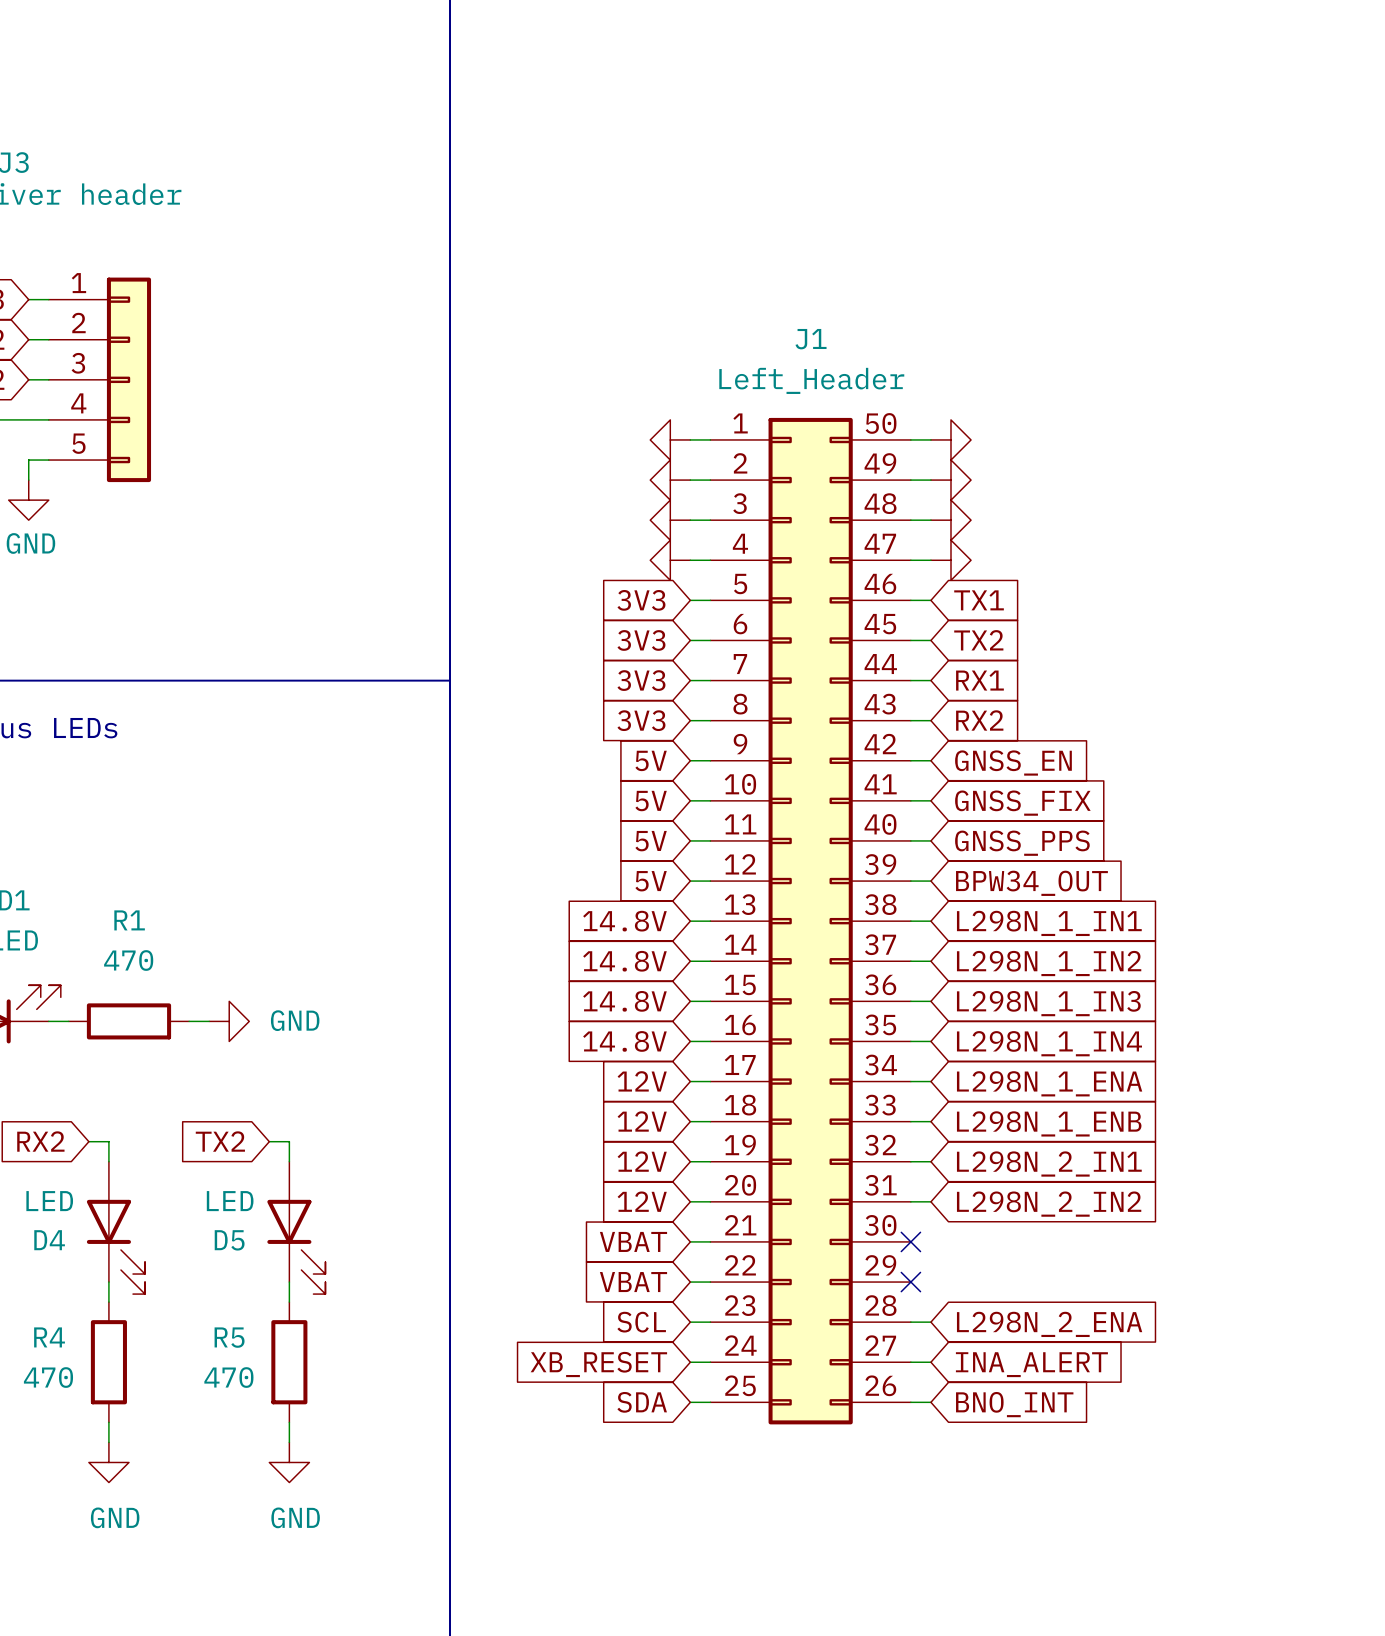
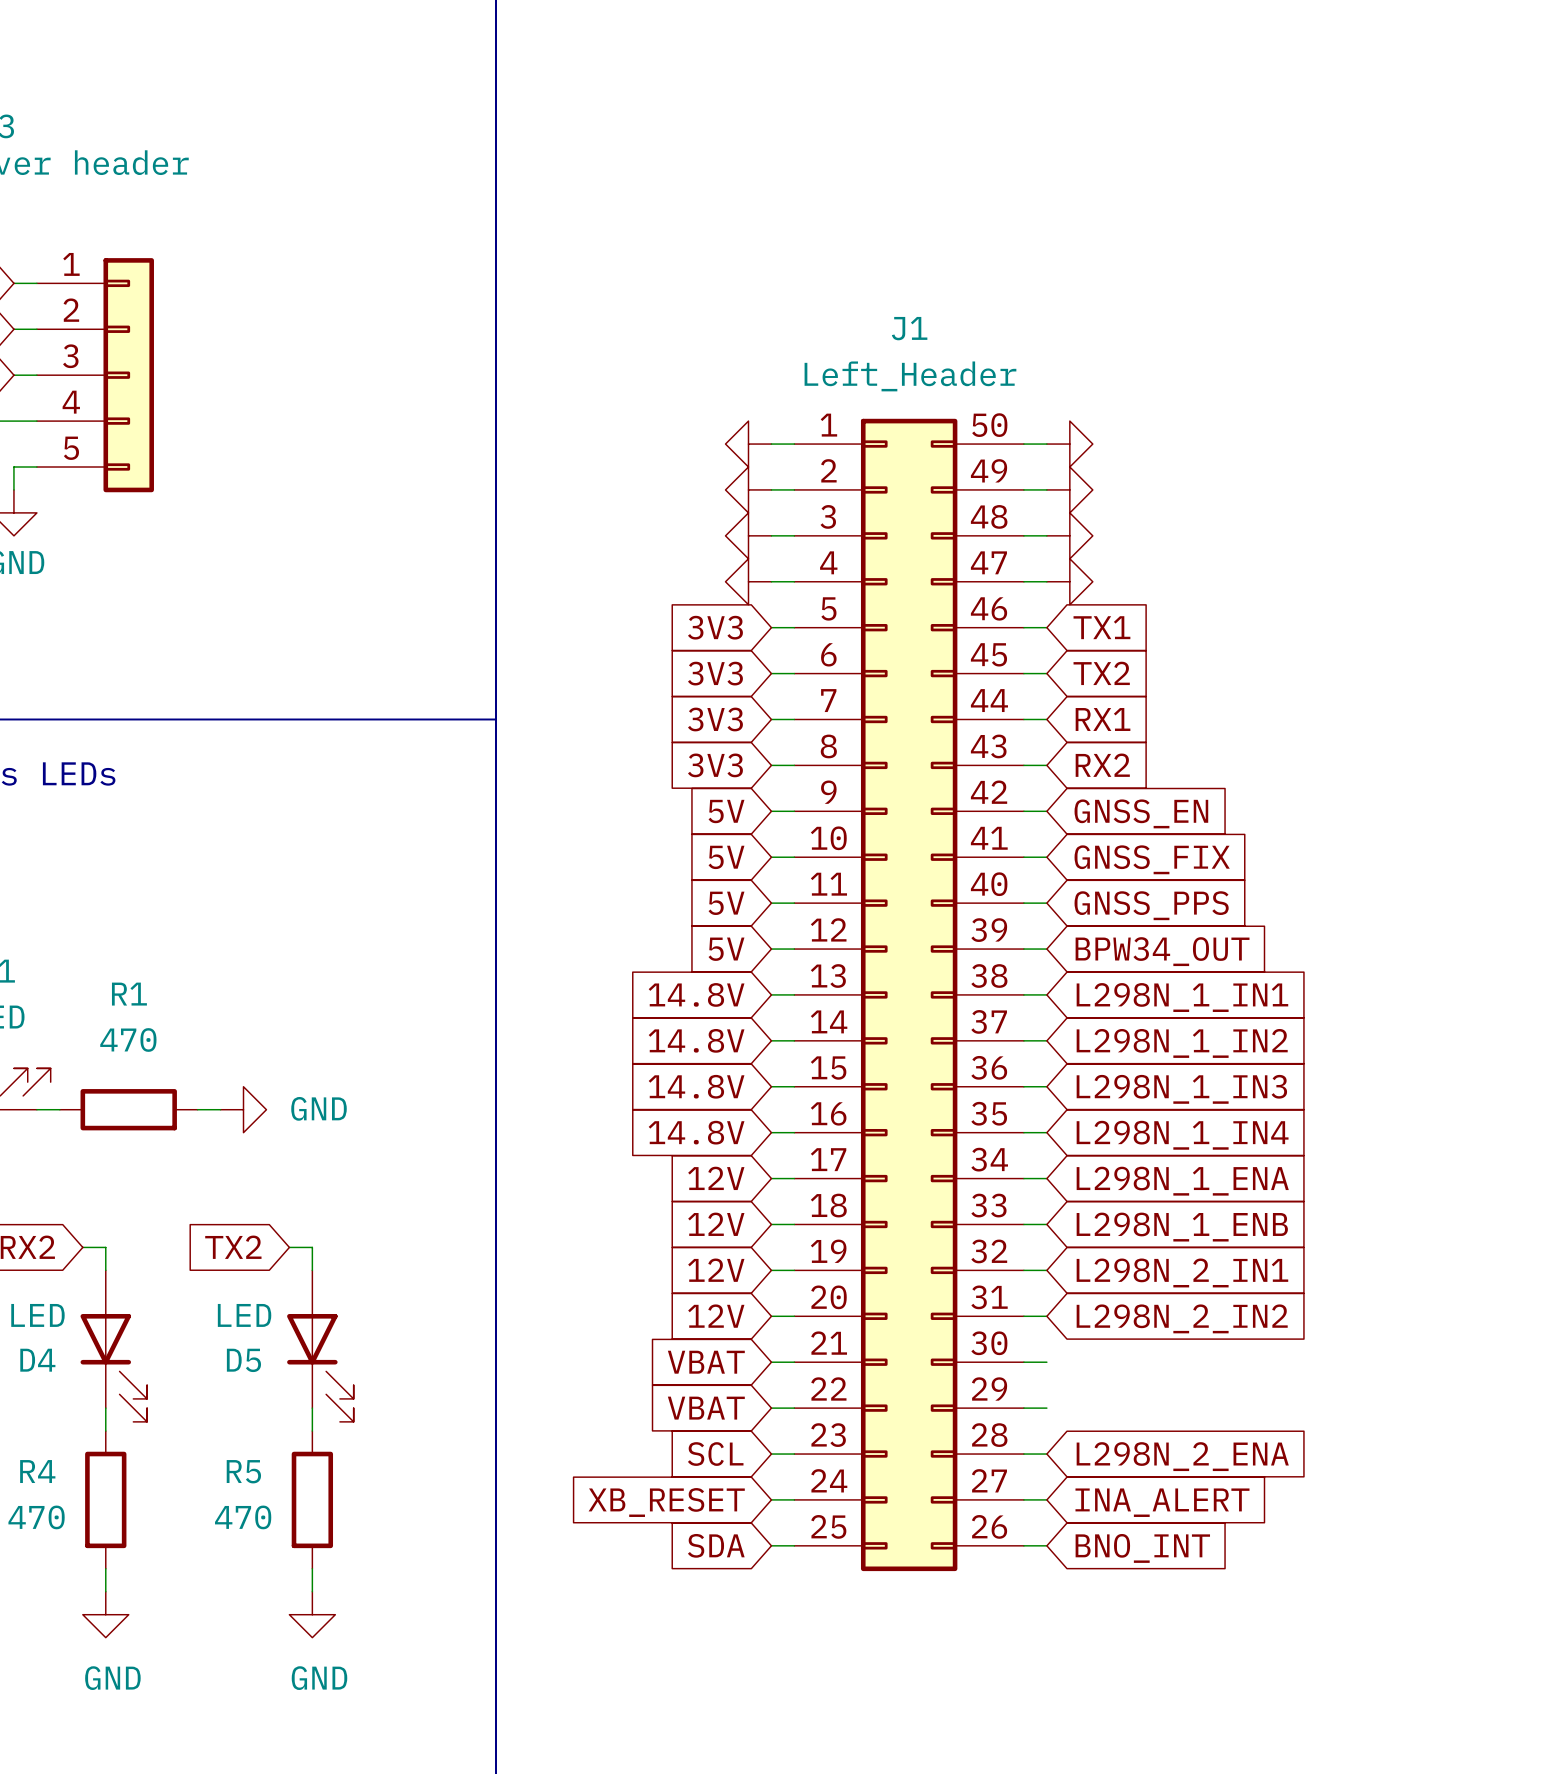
wire: none -> (1023, 1362) (1046, 1362)
no-connect mark: (910, 1241) -> none
wire: none -> (1023, 1408) (1046, 1408)
no-connect mark: (910, 1282) -> none

